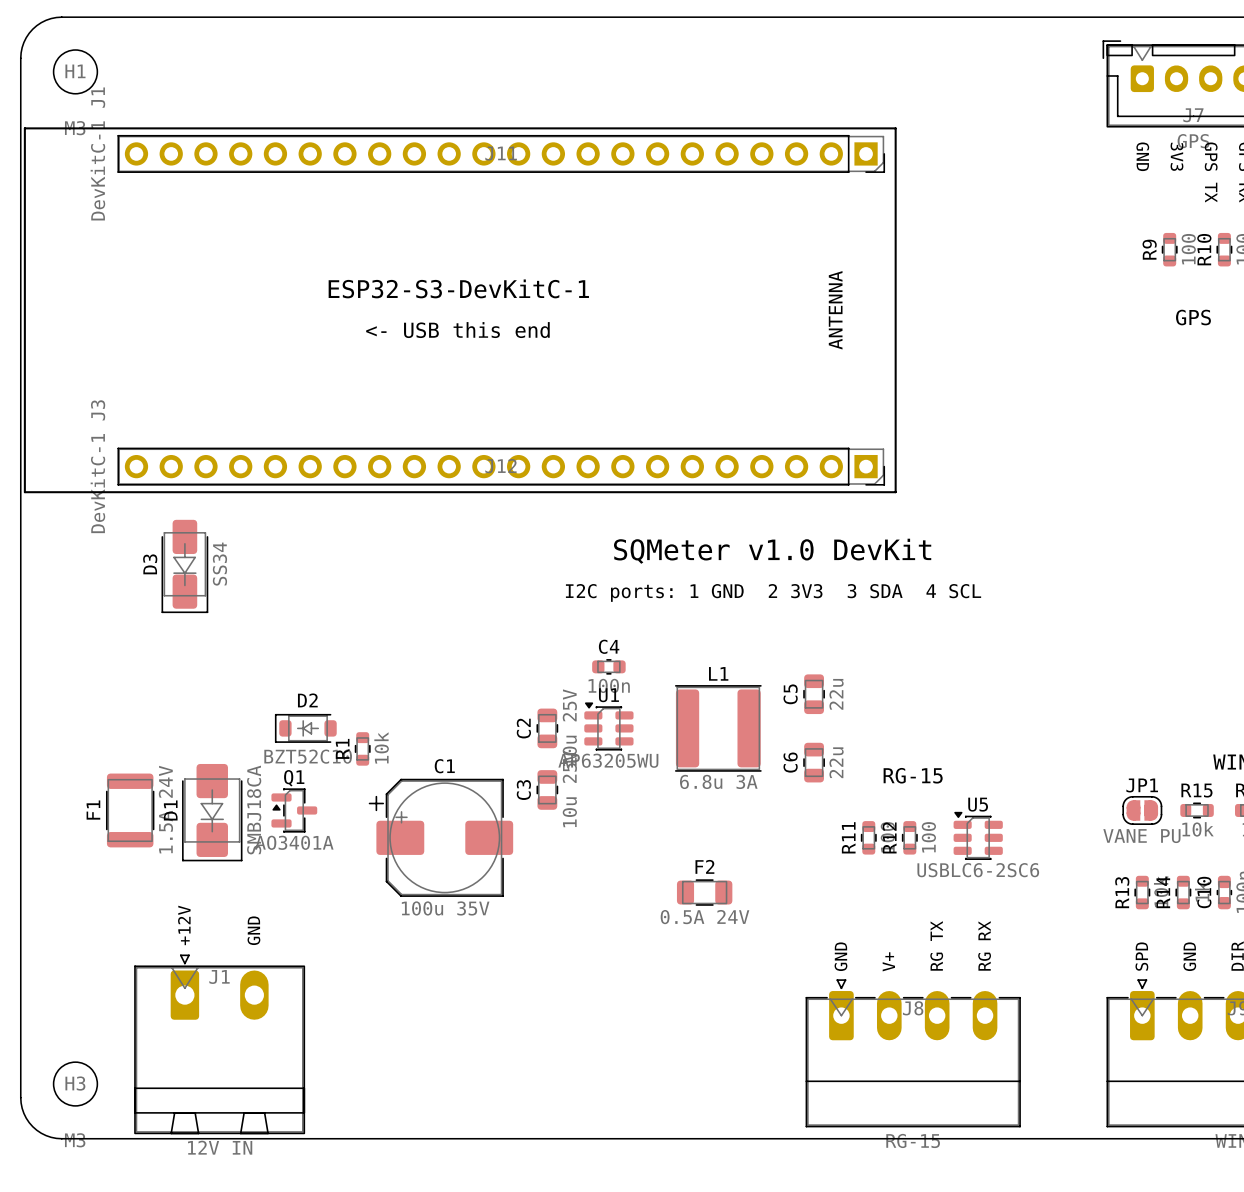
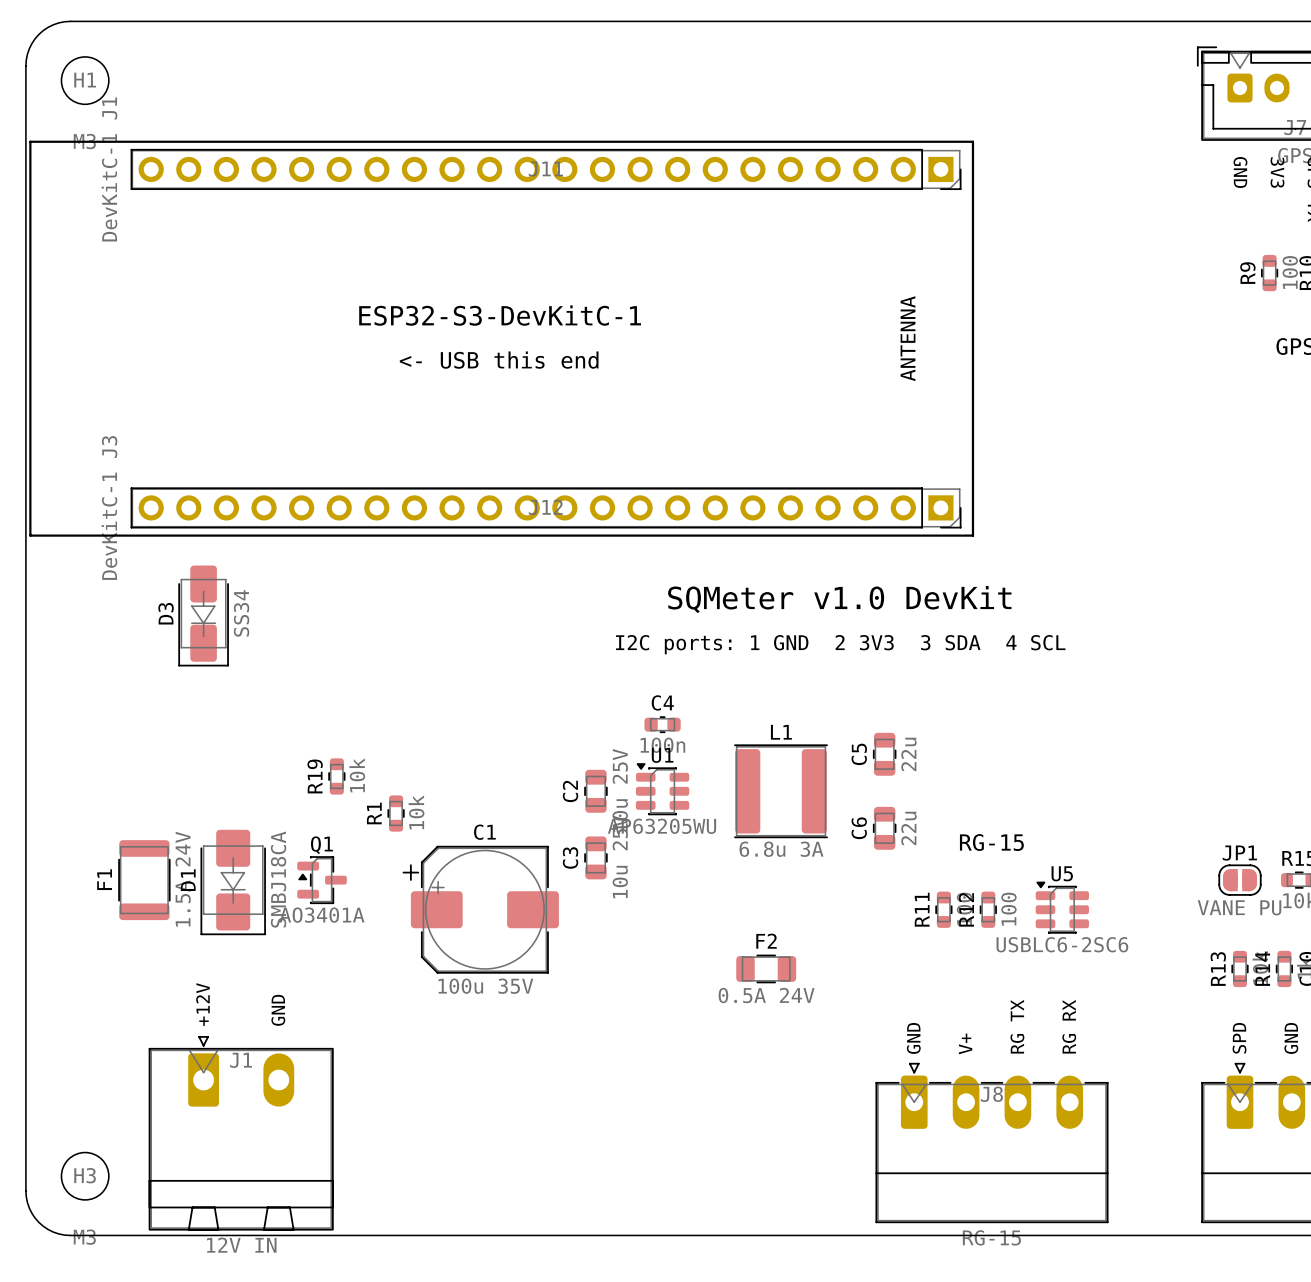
R19: none -> 10k (336, 776)
D2: BZT52C10 (305, 728) -> none

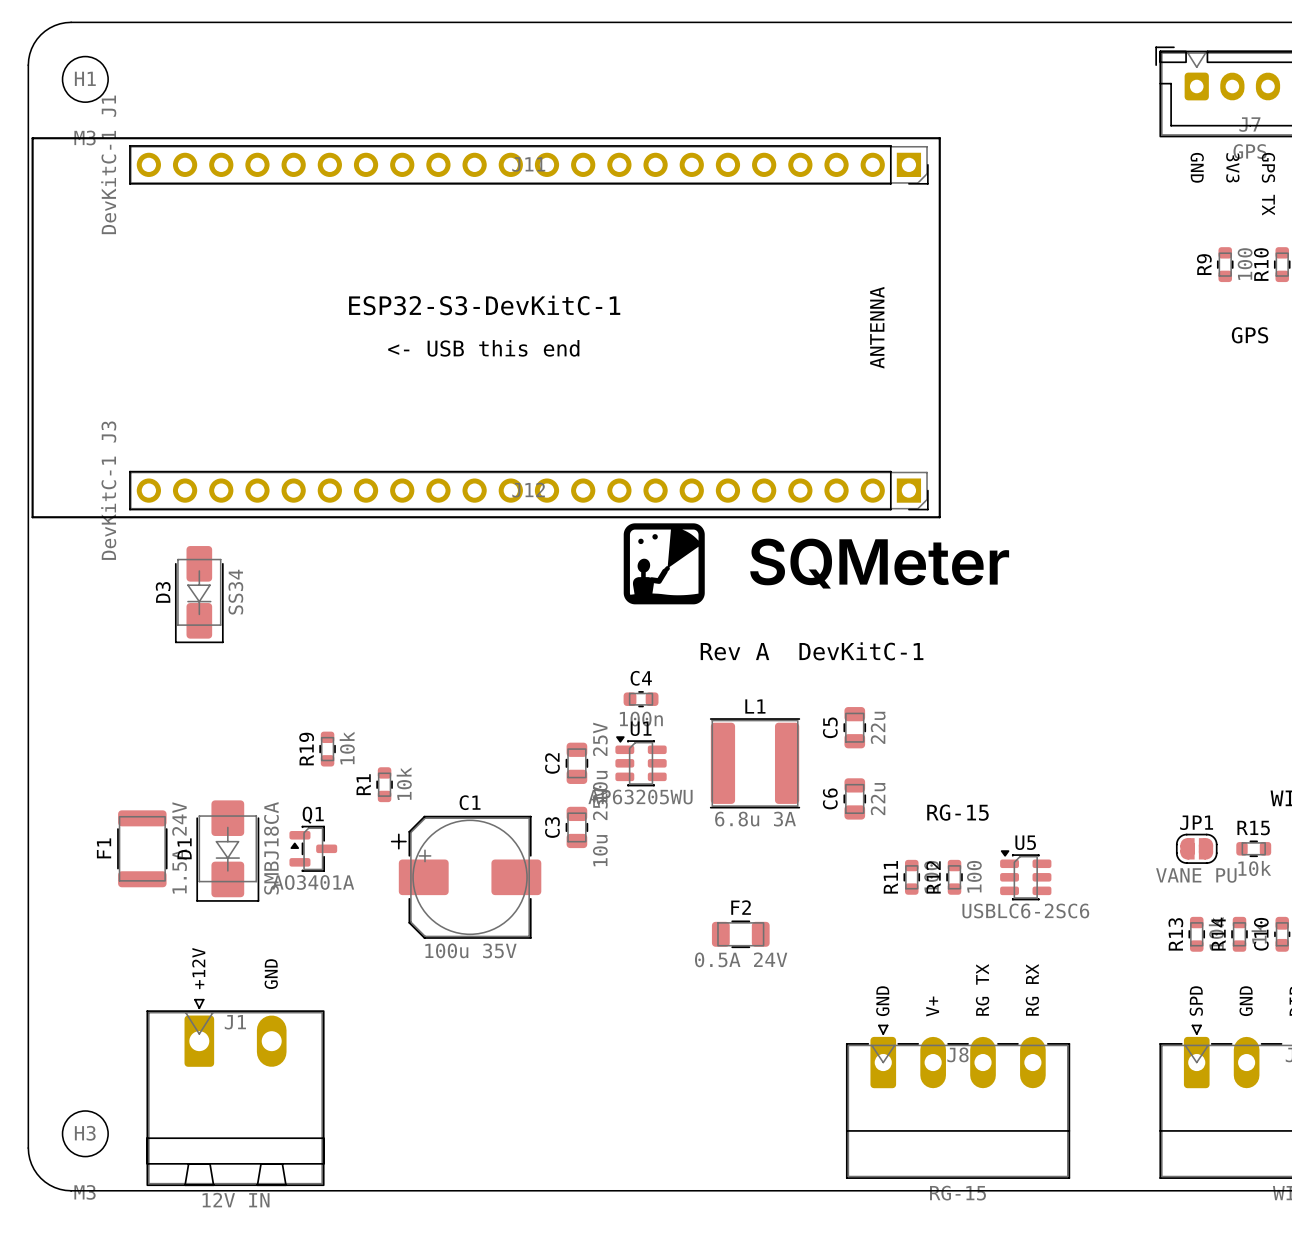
drawing: none -> [623, 523, 705, 605]
drawing: none -> [750, 538, 1010, 589]
text: SQMeter v1.0 DevKit (839, 599) -> none
text: I2C ports: 1 GND 2 3V3 3 SDA 4 SCL (840, 644) -> none
text: none -> Rev A DevKitC-1 (812, 651)

